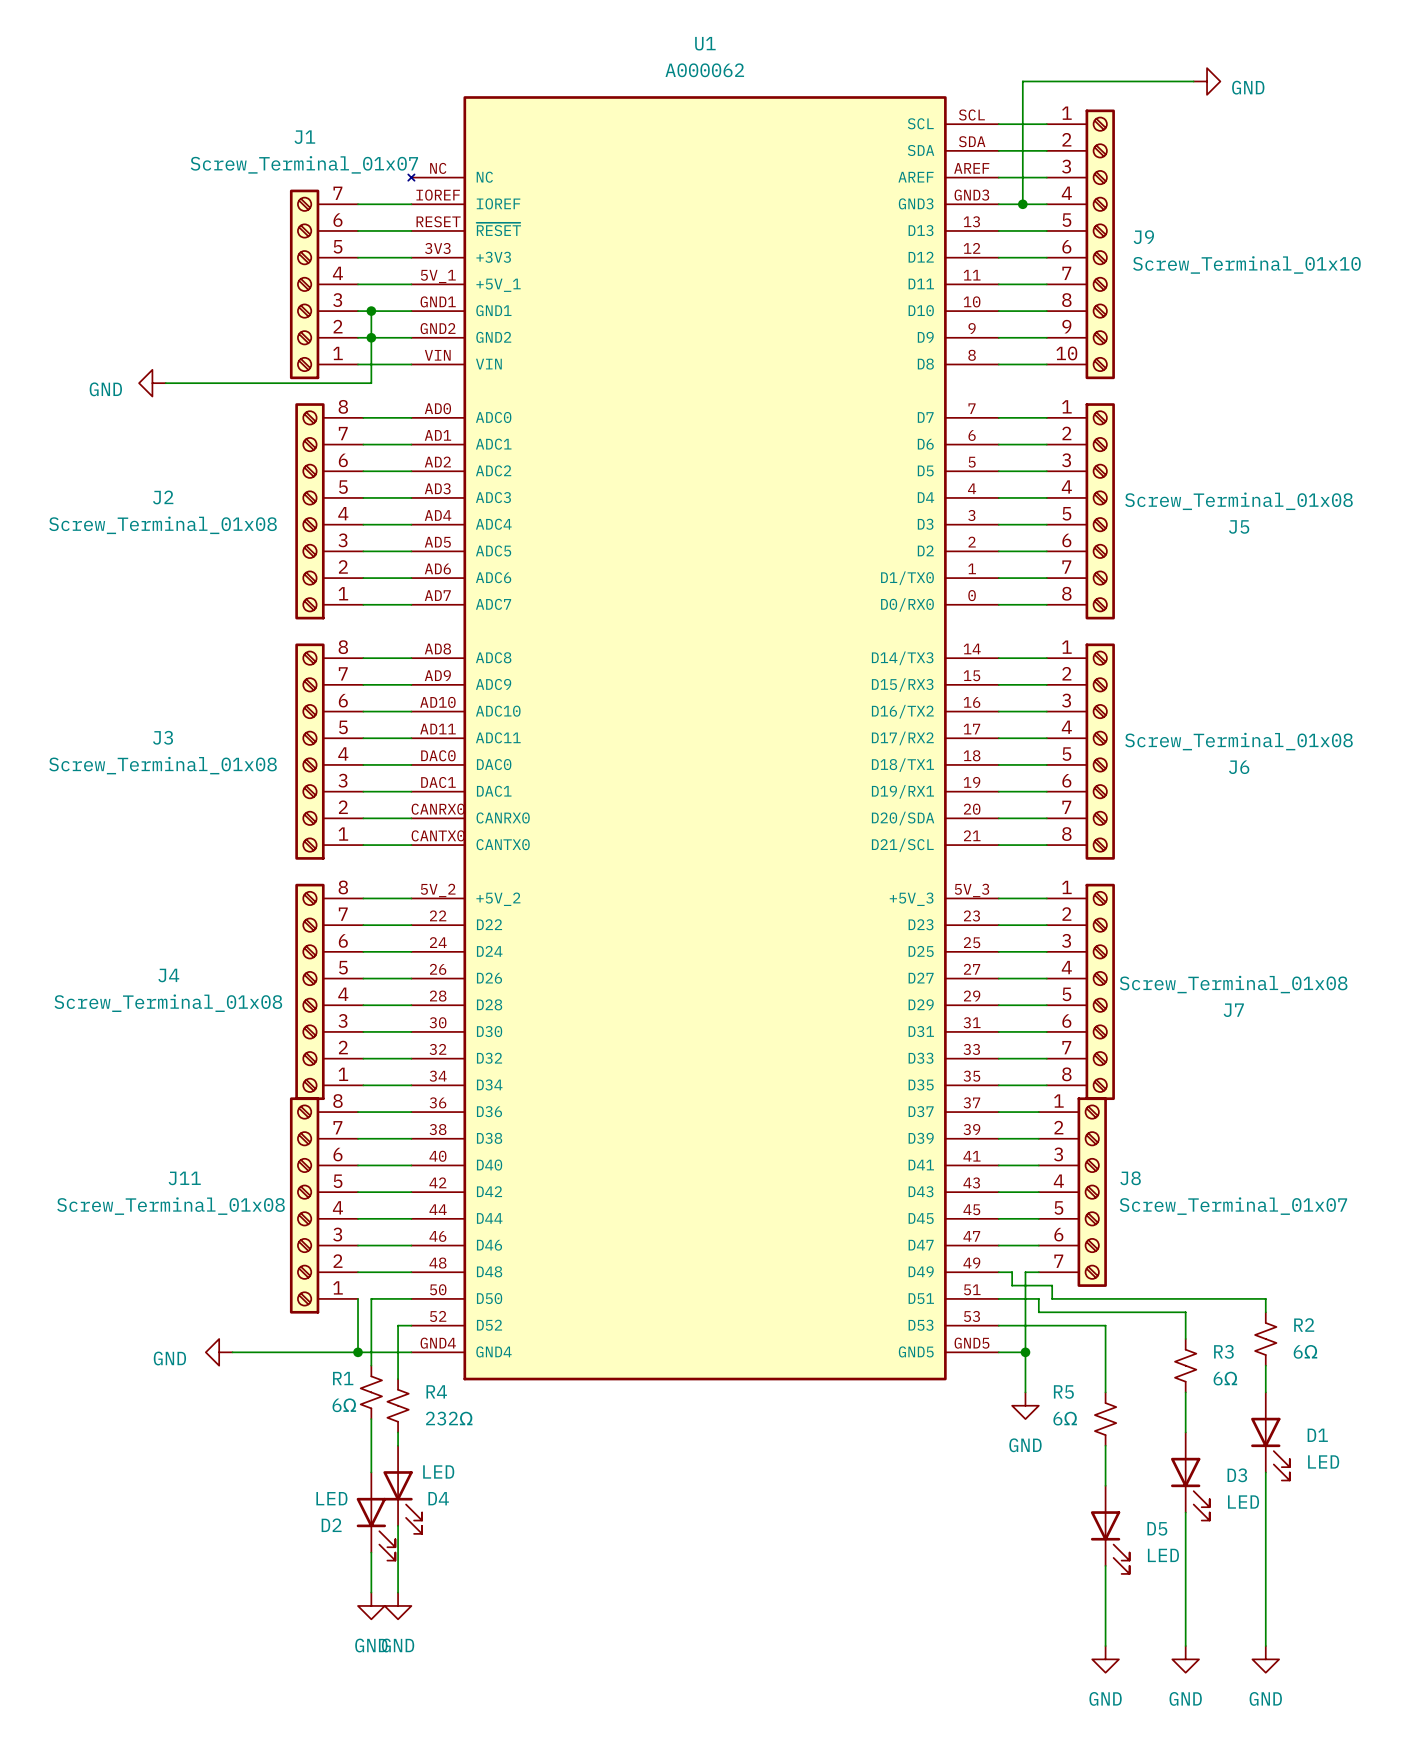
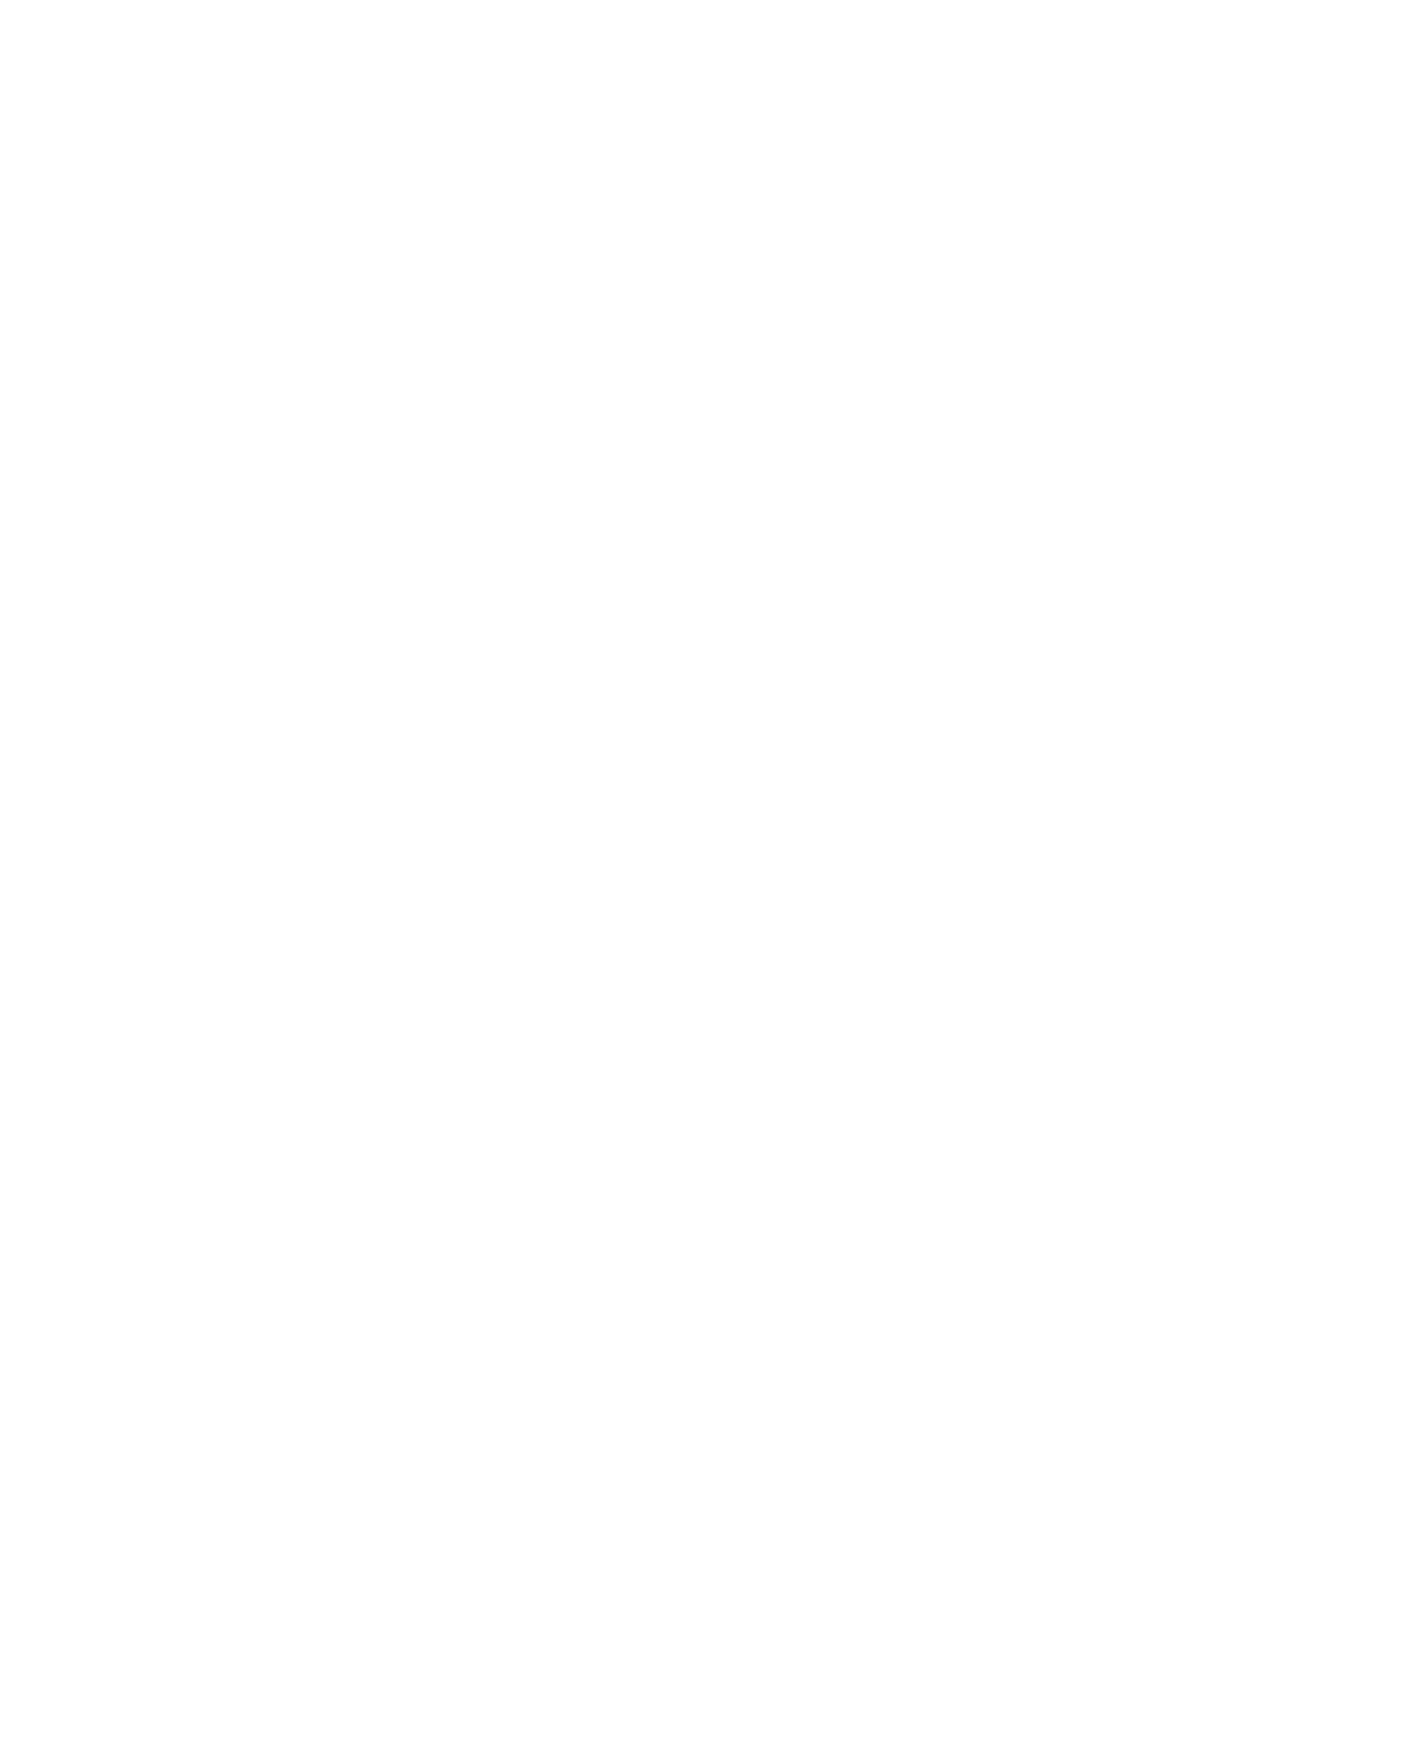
wire: (1193, 81) (1022, 81) (1022, 204) -> none
power symbol: GND (1207, 81) -> none
wire: (998, 124) (1046, 124) -> none
wire: (998, 150) (1046, 150) -> none
wire: (998, 177) (1046, 177) -> none
wire: (358, 204) (411, 204) -> none
wire: (998, 204) (1046, 204) -> none
junction: (1022, 204) -> none
wire: (358, 230) (411, 230) -> none
wire: (998, 230) (1046, 230) -> none
J9: Screw_Terminal_01x10 (1080, 244) -> none
wire: (358, 257) (411, 257) -> none
wire: (998, 257) (1046, 257) -> none
J1: Screw_Terminal_01x07 (323, 284) -> none
wire: (358, 284) (411, 284) -> none
wire: (998, 284) (1046, 284) -> none
wire: (358, 311) (411, 311) -> none
wire: (371, 311) (371, 383) (165, 383) -> none
junction: (371, 311) -> none
wire: (998, 311) (1046, 311) -> none
wire: (358, 337) (411, 337) -> none
junction: (371, 337) -> none
wire: (998, 337) (1046, 337) -> none
wire: (358, 364) (411, 364) -> none
wire: (998, 364) (1046, 364) -> none
power symbol: GND (152, 383) -> none
wire: (363, 417) (411, 417) -> none
wire: (998, 417) (1046, 417) -> none
wire: (363, 444) (411, 444) -> none
wire: (998, 444) (1046, 444) -> none
wire: (363, 471) (411, 471) -> none
wire: (998, 471) (1046, 471) -> none
wire: (363, 497) (411, 497) -> none
wire: (998, 497) (1046, 497) -> none
J2: Screw_Terminal_01x08 (329, 511) -> none
J5: Screw_Terminal_01x08 (1080, 511) -> none
wire: (363, 524) (411, 524) -> none
wire: (998, 524) (1046, 524) -> none
wire: (363, 551) (411, 551) -> none
wire: (998, 551) (1046, 551) -> none
wire: (363, 578) (411, 578) -> none
wire: (998, 578) (1046, 578) -> none
wire: (363, 604) (411, 604) -> none
wire: (998, 604) (1046, 604) -> none
wire: (363, 658) (411, 658) -> none
wire: (998, 658) (1046, 658) -> none
wire: (363, 684) (411, 684) -> none
wire: (998, 684) (1046, 684) -> none
wire: (363, 711) (411, 711) -> none
wire: (998, 711) (1046, 711) -> none
wire: (363, 738) (411, 738) -> none
U1: A000062 (703, 738) -> none
wire: (998, 738) (1046, 738) -> none
J3: Screw_Terminal_01x08 (329, 751) -> none
J6: Screw_Terminal_01x08 (1080, 751) -> none
wire: (363, 764) (411, 764) -> none
wire: (998, 764) (1046, 764) -> none
wire: (363, 791) (411, 791) -> none
wire: (998, 791) (1046, 791) -> none
wire: (363, 818) (411, 818) -> none
wire: (998, 818) (1046, 818) -> none
wire: (363, 845) (411, 845) -> none
wire: (998, 845) (1046, 845) -> none
wire: (363, 898) (411, 898) -> none
wire: (998, 898) (1046, 898) -> none
wire: (363, 925) (411, 925) -> none
wire: (998, 925) (1046, 925) -> none
wire: (363, 951) (411, 951) -> none
wire: (998, 951) (1046, 951) -> none
wire: (363, 978) (411, 978) -> none
wire: (998, 978) (1046, 978) -> none
J4: Screw_Terminal_01x08 (329, 991) -> none
J7: Screw_Terminal_01x08 (1080, 991) -> none
wire: (363, 1005) (411, 1005) -> none
wire: (998, 1005) (1046, 1005) -> none
wire: (363, 1031) (411, 1031) -> none
wire: (998, 1031) (1046, 1031) -> none
wire: (363, 1058) (411, 1058) -> none
wire: (998, 1058) (1046, 1058) -> none
wire: (363, 1085) (411, 1085) -> none
wire: (998, 1085) (1046, 1085) -> none
wire: (358, 1112) (411, 1112) -> none
wire: (998, 1112) (1038, 1112) -> none
wire: (358, 1138) (411, 1138) -> none
wire: (998, 1138) (1038, 1138) -> none
wire: (358, 1165) (411, 1165) -> none
wire: (998, 1165) (1038, 1165) -> none
wire: (358, 1192) (411, 1192) -> none
wire: (998, 1192) (1038, 1192) -> none
J8: Screw_Terminal_01x07 (1072, 1192) -> none
J11: Screw_Terminal_01x08 (323, 1205) -> none
wire: (358, 1218) (411, 1218) -> none
wire: (998, 1218) (1038, 1218) -> none
wire: (358, 1245) (411, 1245) -> none
wire: (998, 1245) (1038, 1245) -> none
wire: (358, 1272) (411, 1272) -> none
wire: (998, 1272) (1012, 1272) (1012, 1285) (1052, 1285) (1052, 1298) (1265, 1298) (1265, 1312) -> none
wire: (1038, 1272) (1025, 1272) (1025, 1392) -> none
wire: (358, 1298) (358, 1352) -> none
wire: (411, 1298) (371, 1298) (371, 1365) -> none
wire: (998, 1298) (1038, 1298) (1038, 1312) (1185, 1312) (1185, 1338) -> none
wire: (411, 1325) (398, 1325) (398, 1379) -> none
wire: (998, 1325) (1105, 1325) (1105, 1392) -> none
R2: 6Ω (1265, 1338) -> none
power symbol: GND (219, 1352) -> none
wire: (232, 1352) (411, 1352) -> none
junction: (358, 1352) -> none
wire: (998, 1352) (1025, 1352) -> none
junction: (1025, 1352) -> none
R3: 6Ω (1185, 1365) -> none
wire: (1265, 1365) (1265, 1392) -> none
R1: 6Ω (371, 1392) -> none
wire: (1185, 1392) (1185, 1432) -> none
R4: 232Ω (398, 1405) -> none
power symbol: GND (1025, 1405) -> none
wire: (371, 1419) (371, 1472) -> none
R5: 6Ω (1105, 1419) -> none
wire: (398, 1432) (398, 1445) -> none
D1: LED (1270, 1436) -> none
wire: (1105, 1445) (1105, 1485) -> none
wire: (1265, 1472) (1265, 1646) -> none
D3: LED (1190, 1476) -> none
D4: LED (402, 1489) -> none
wire: (1185, 1512) (1185, 1646) -> none
D2: LED (376, 1516) -> none
wire: (398, 1525) (398, 1592) -> none
D5: LED (1110, 1529) -> none
wire: (371, 1552) (371, 1592) -> none
wire: (1105, 1565) (1105, 1646) -> none
power symbol: GND (371, 1605) -> none
power symbol: GND (398, 1605) -> none
power symbol: GND (1105, 1659) -> none
power symbol: GND (1185, 1659) -> none
power symbol: GND (1265, 1659) -> none

